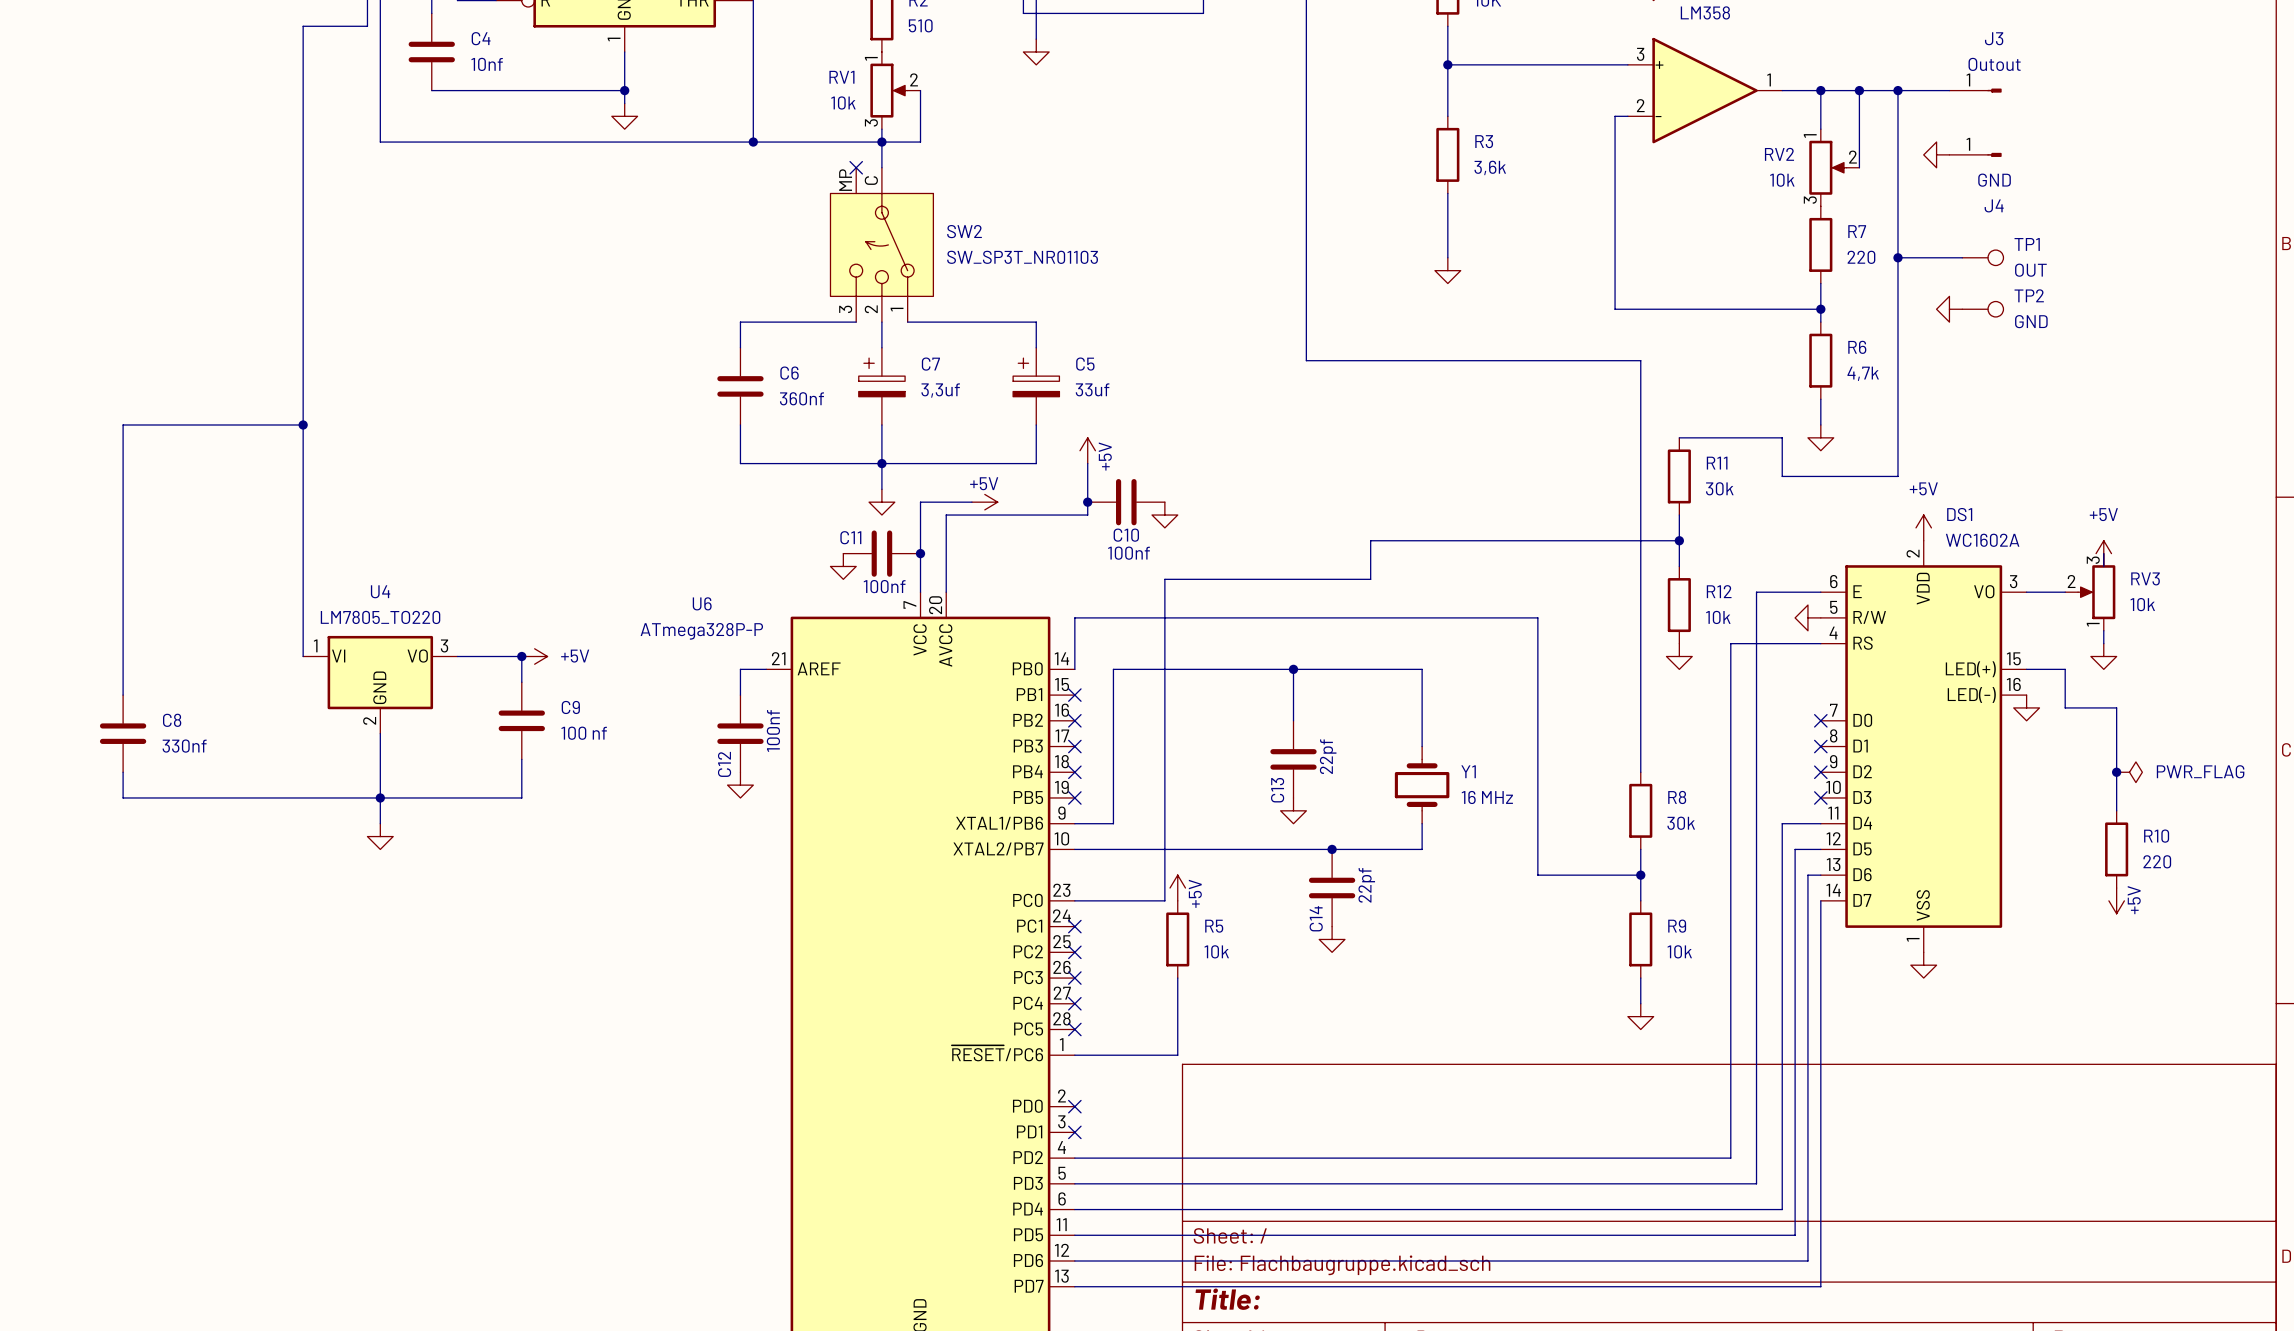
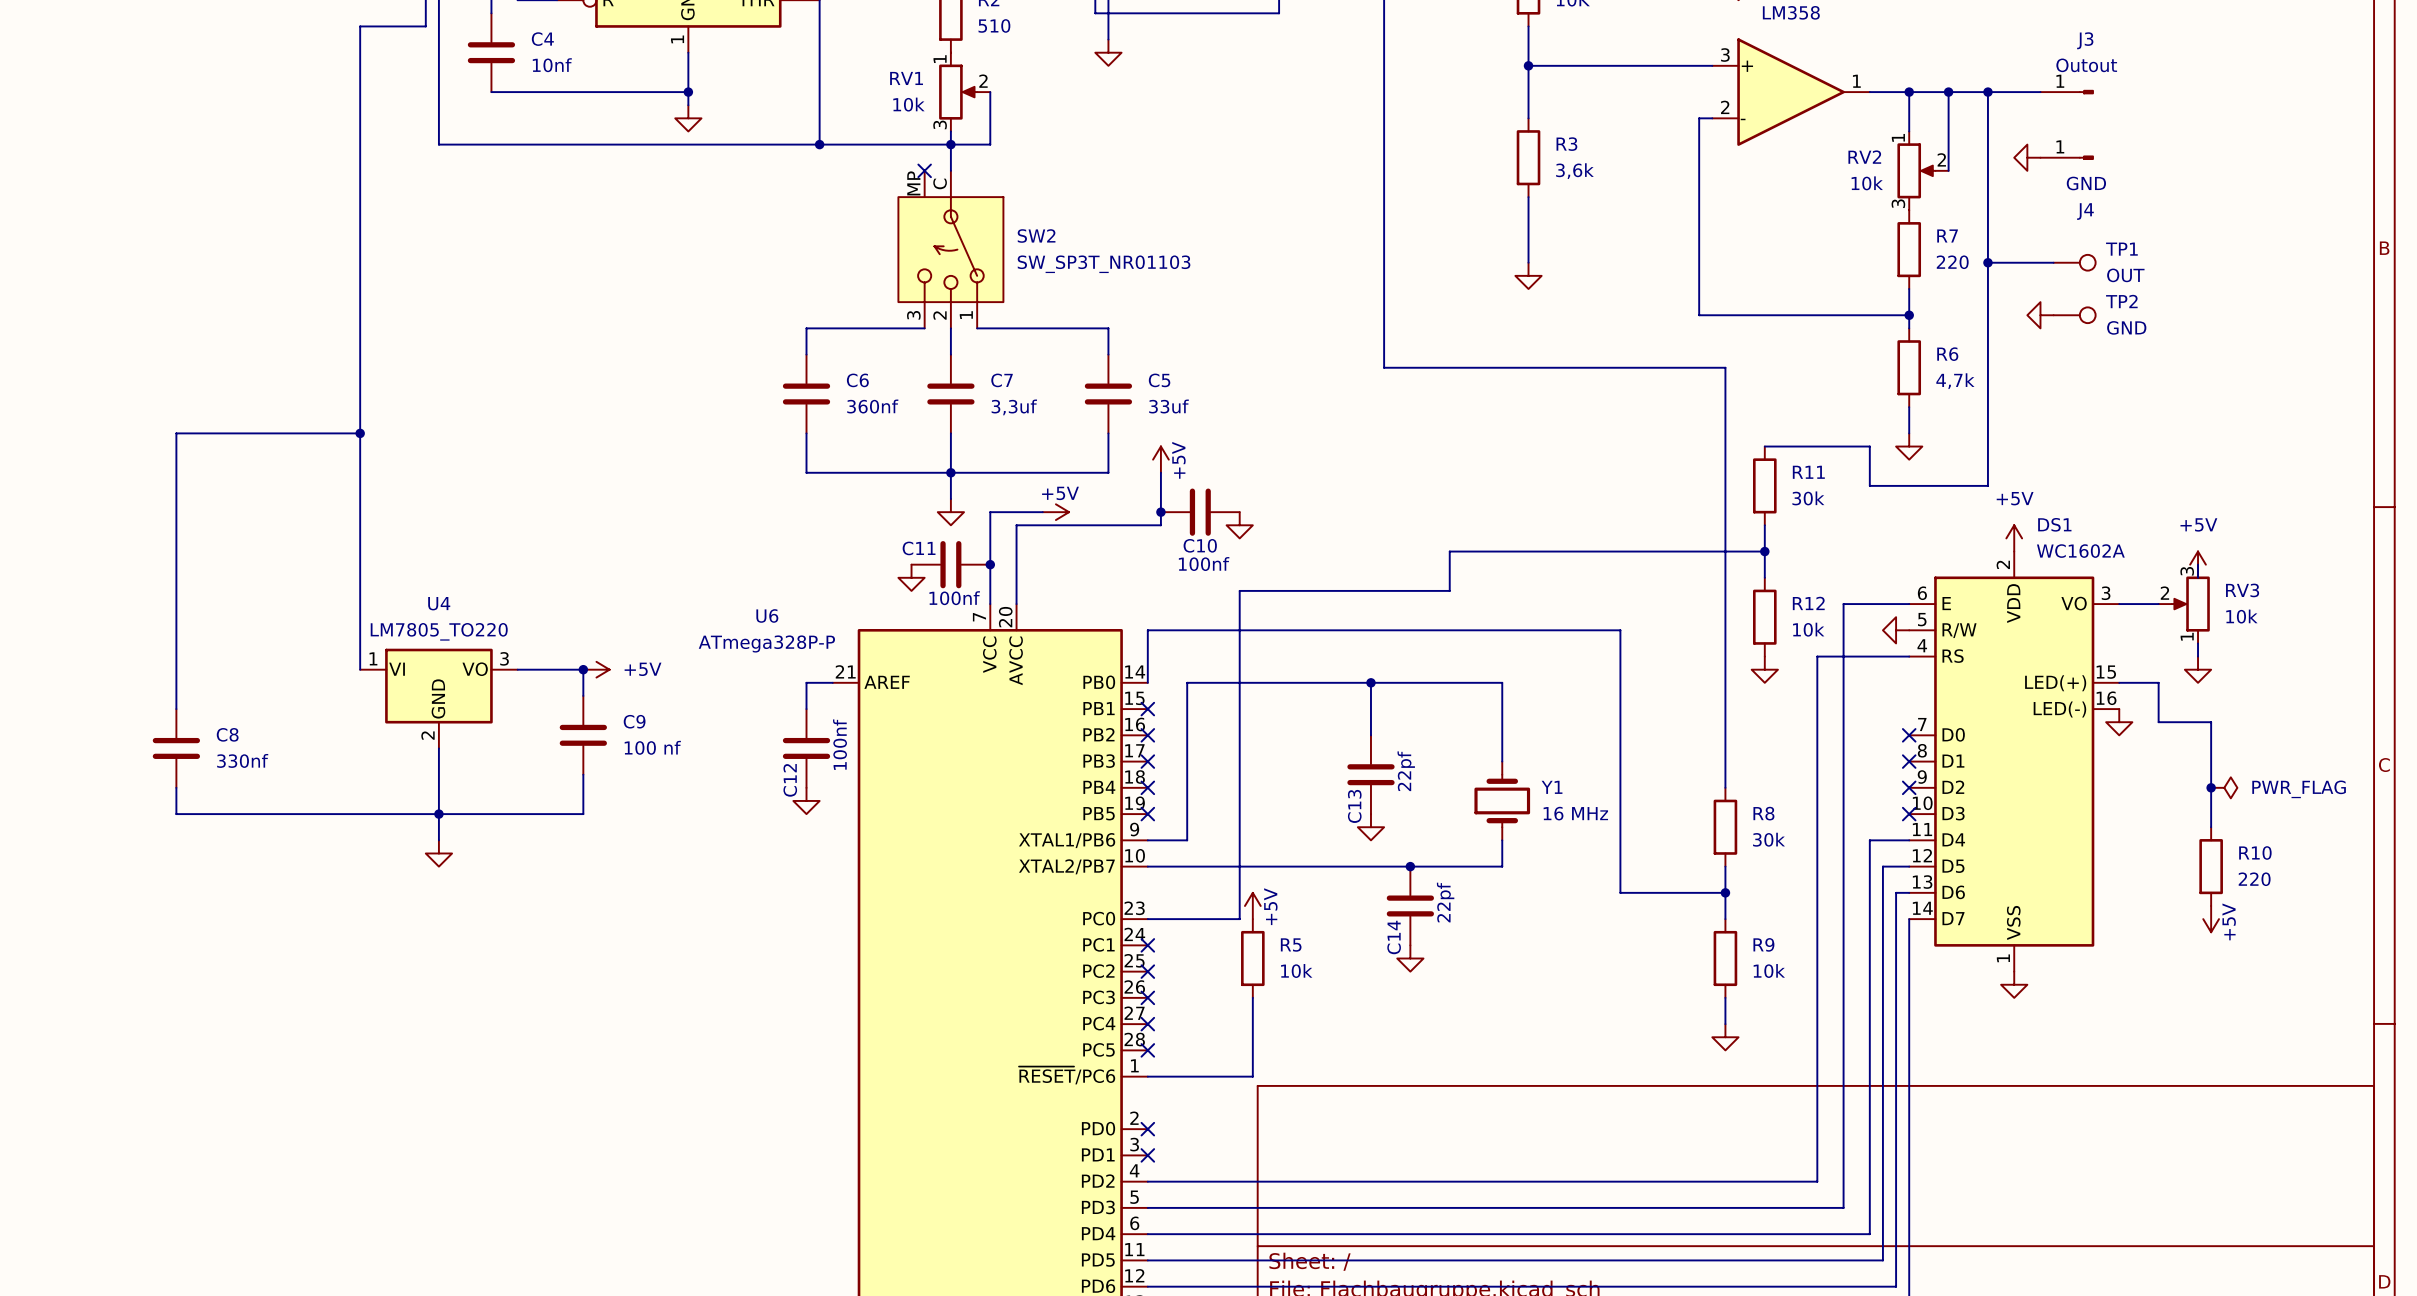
C7 symbol: [858, 347, 906, 425] -> [927, 354, 975, 434]
C5 symbol: [1013, 347, 1060, 425] -> [1084, 354, 1133, 434]

